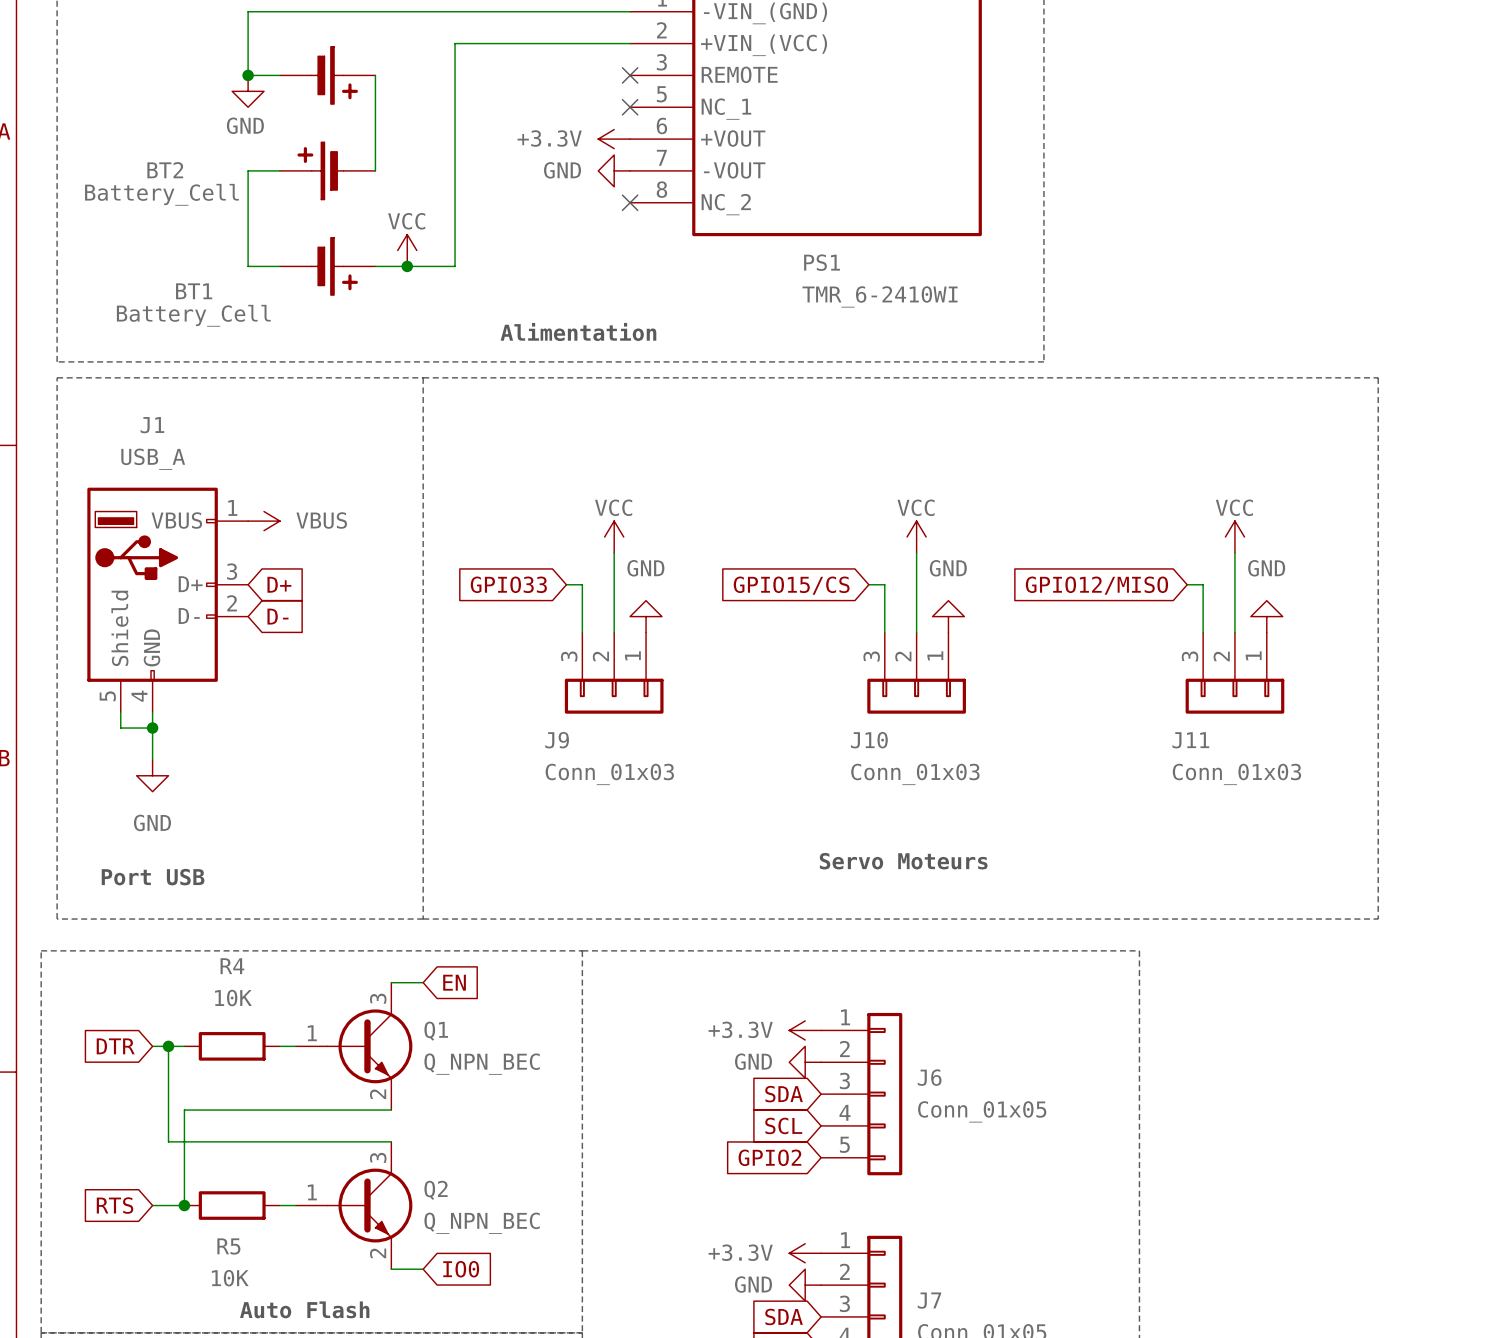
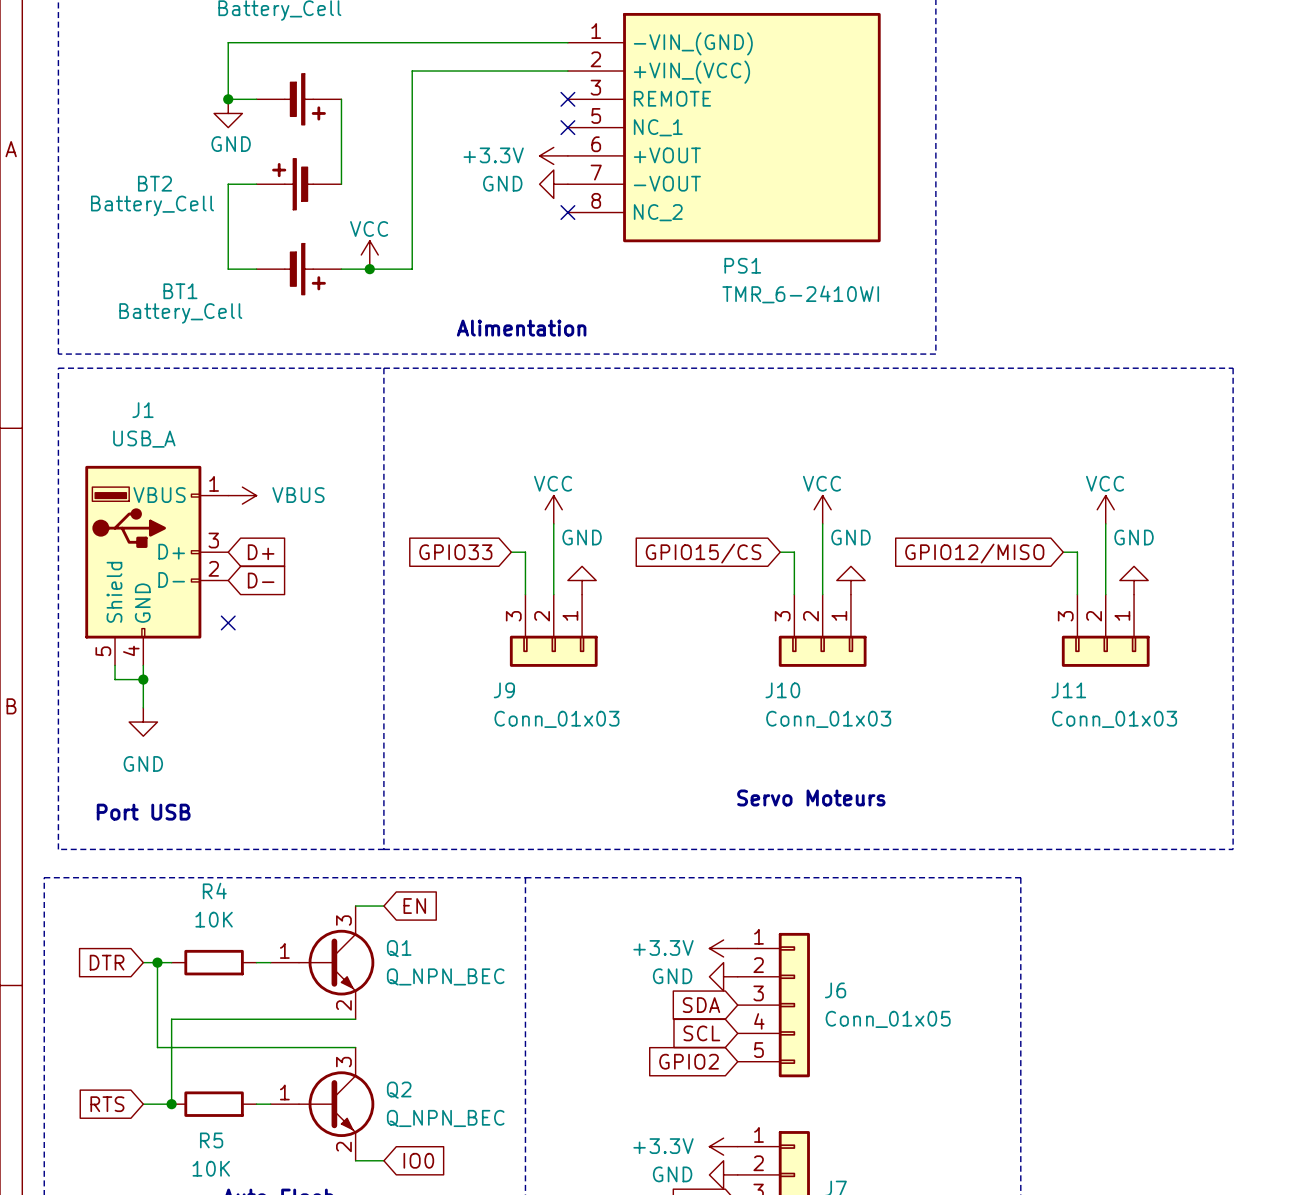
no-connect mark: none -> (228, 622)

